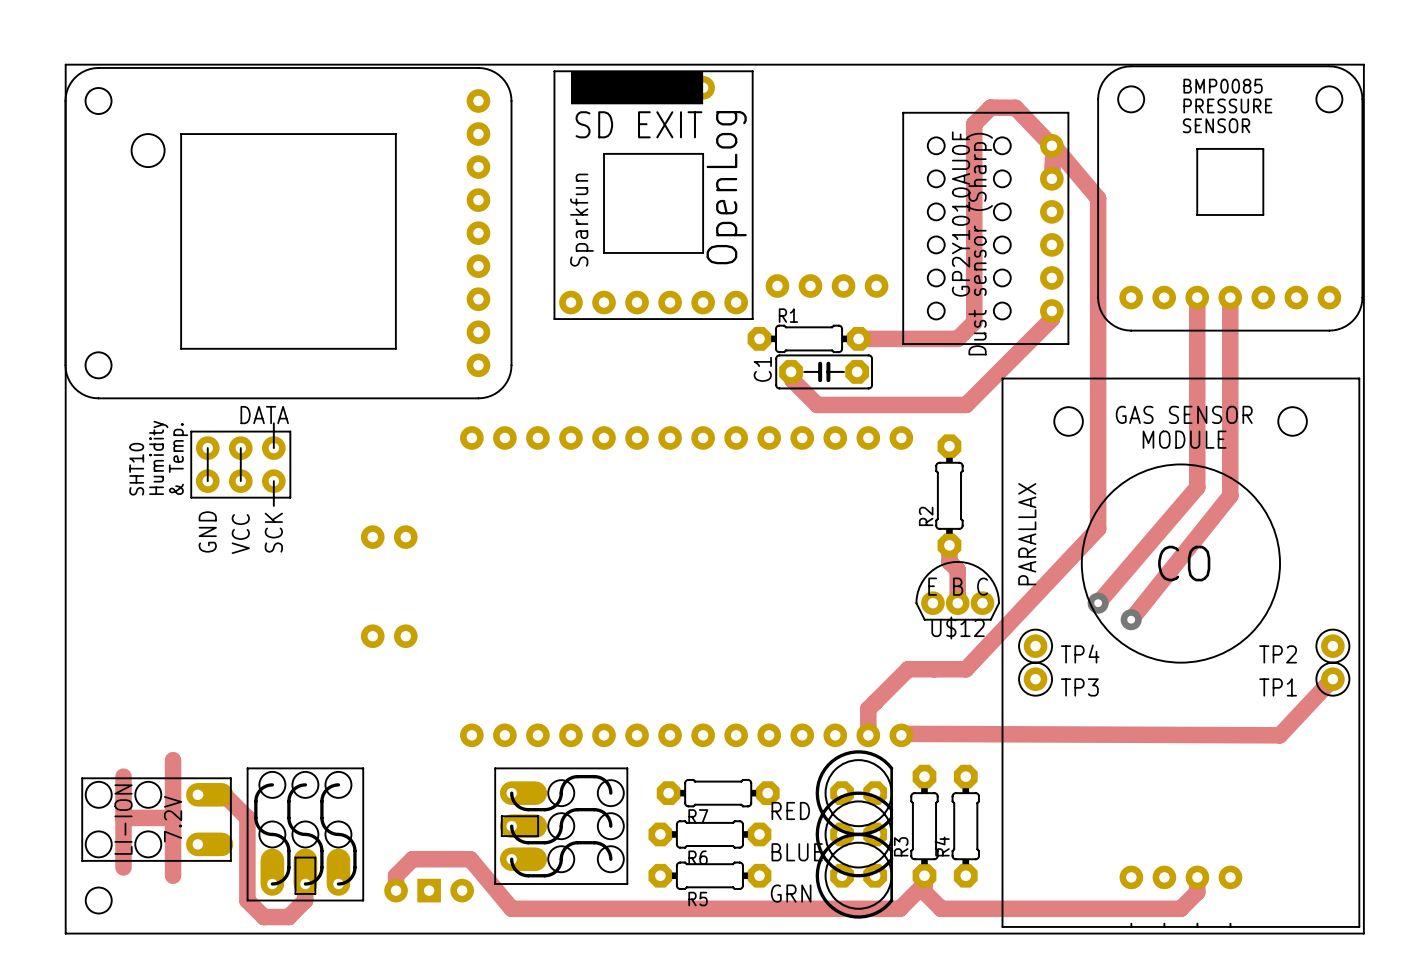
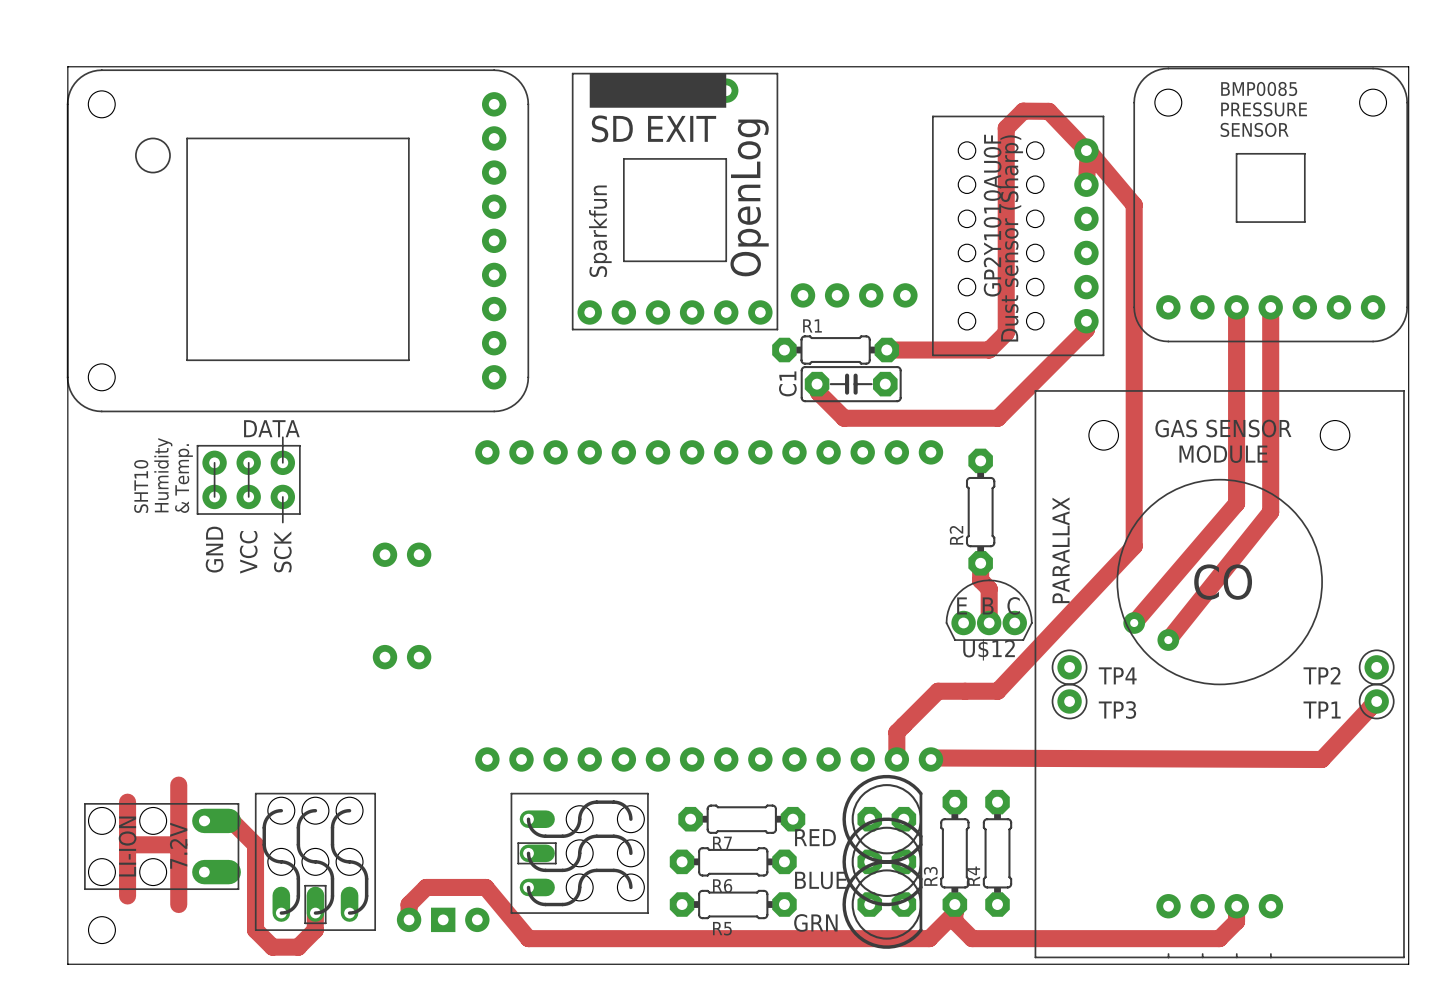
part footprint: [246, 767, 365, 902] -> [254, 792, 377, 931]
part footprint: [494, 767, 629, 885] -> [510, 792, 649, 914]

